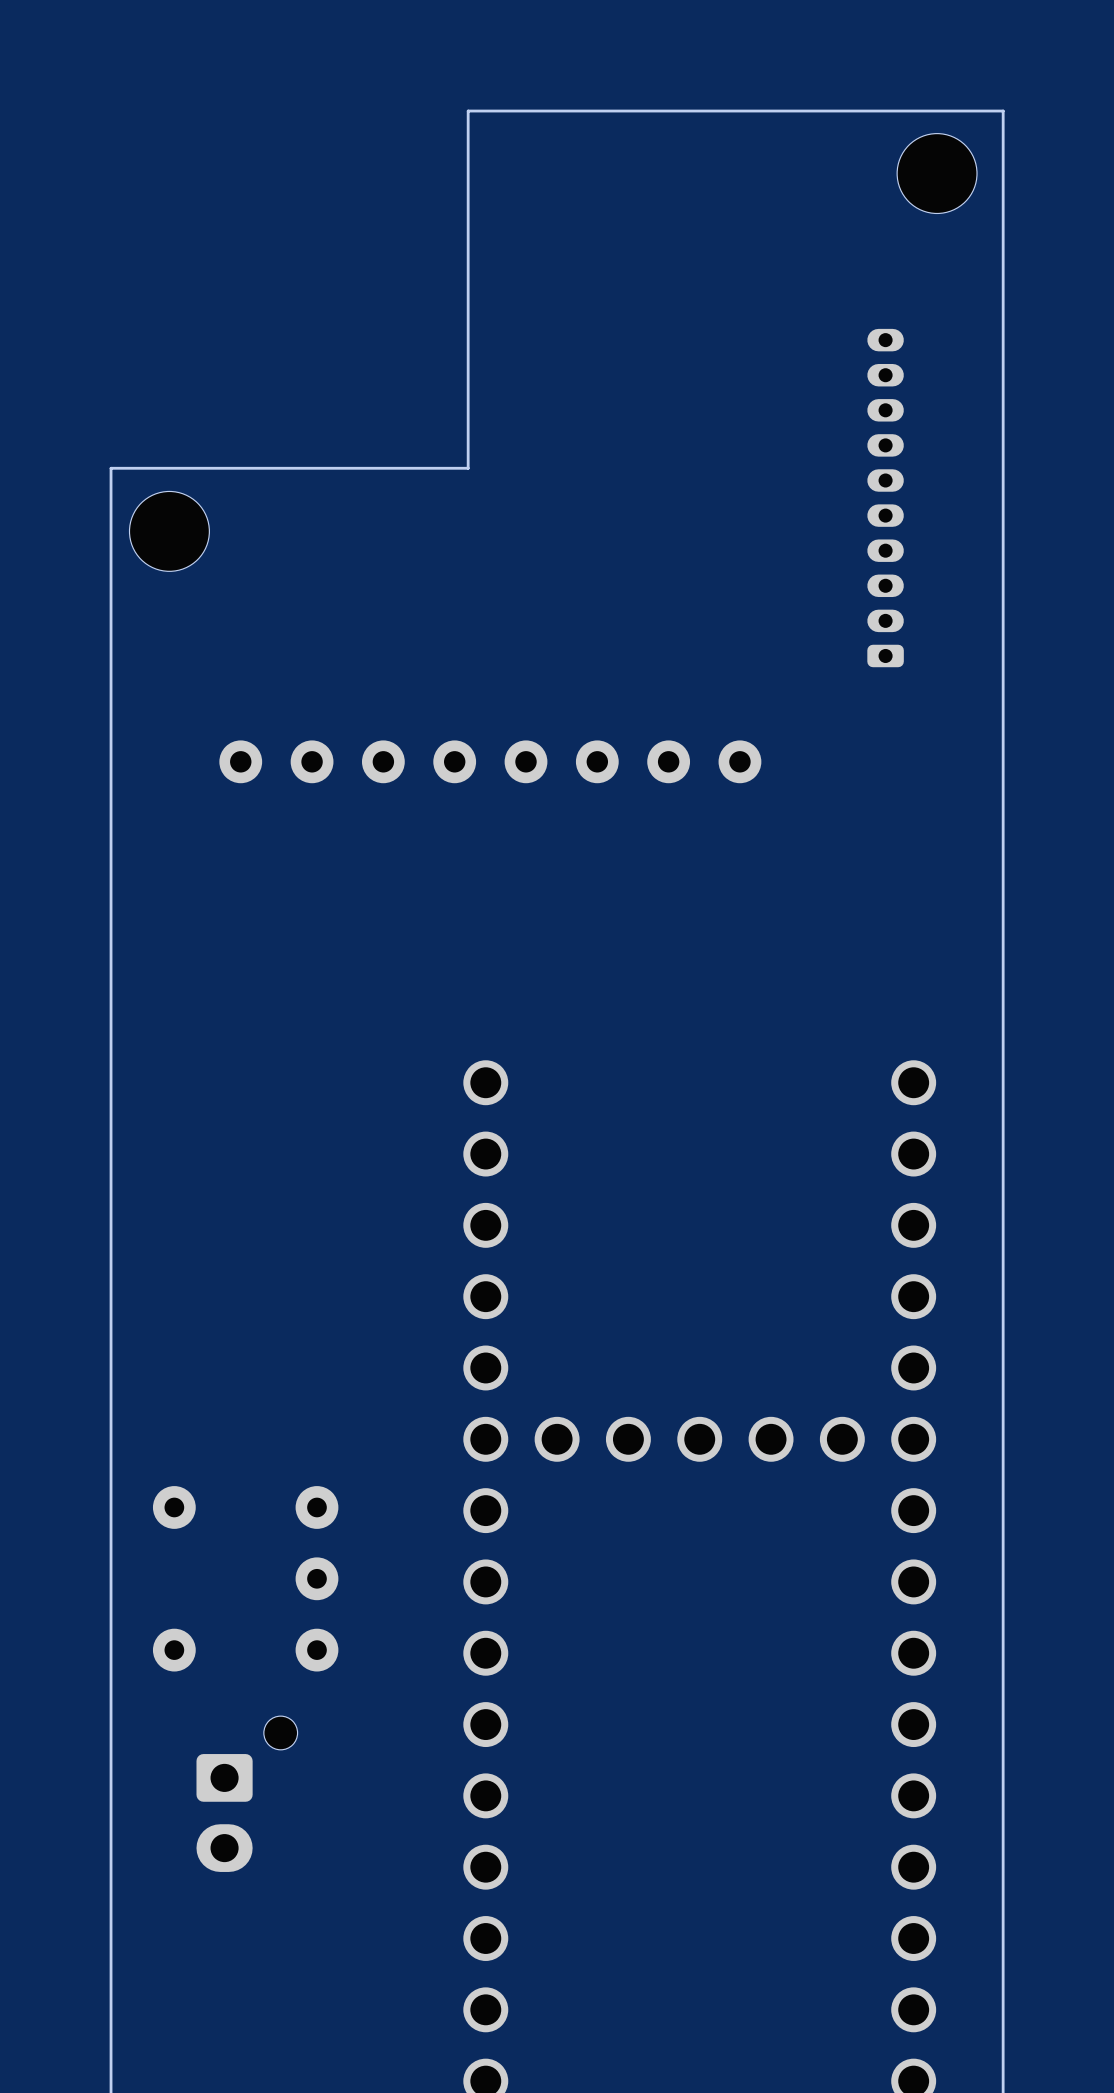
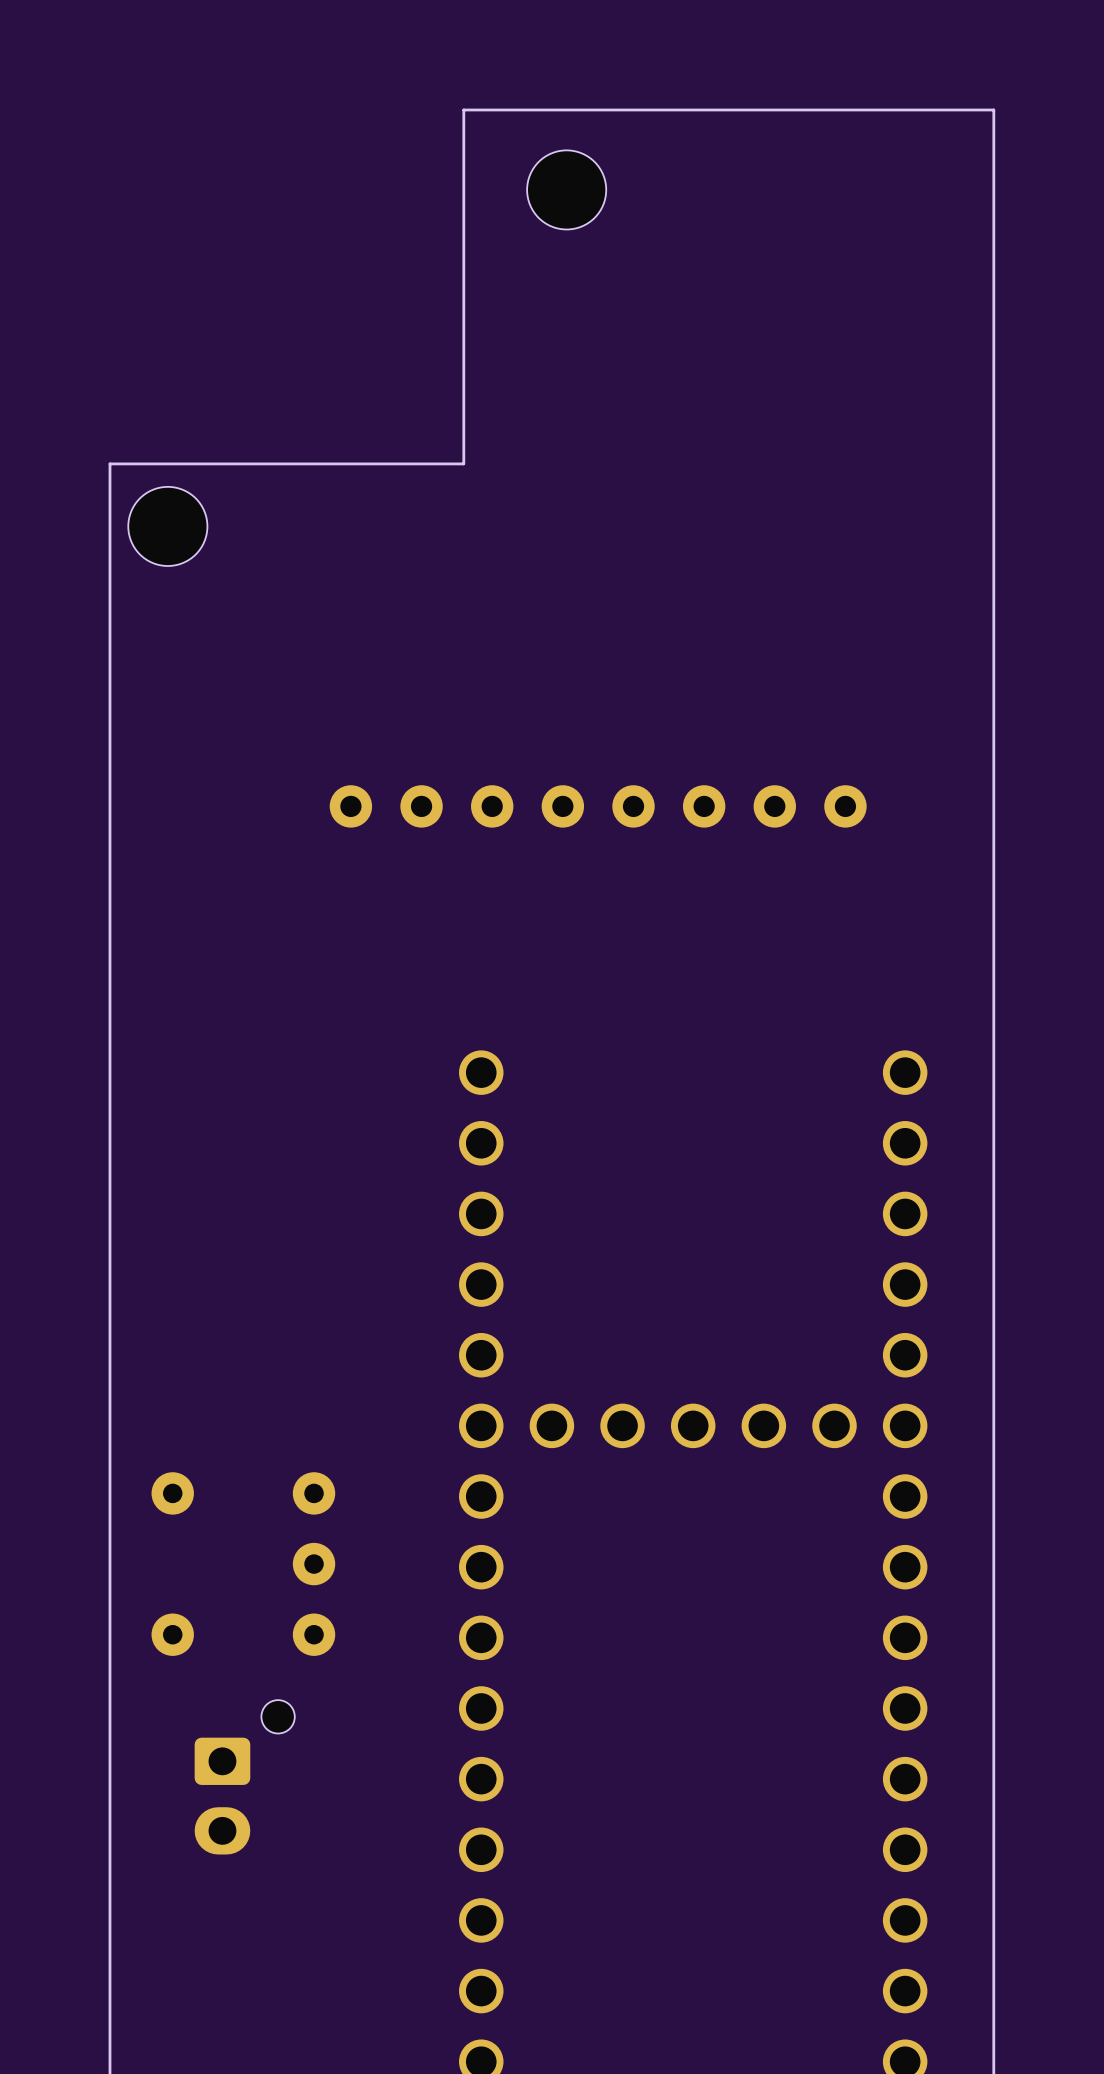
part position: (937, 173) -> (566, 189)
part: (885, 498) -> none
part position: (490, 761) -> (598, 806)

